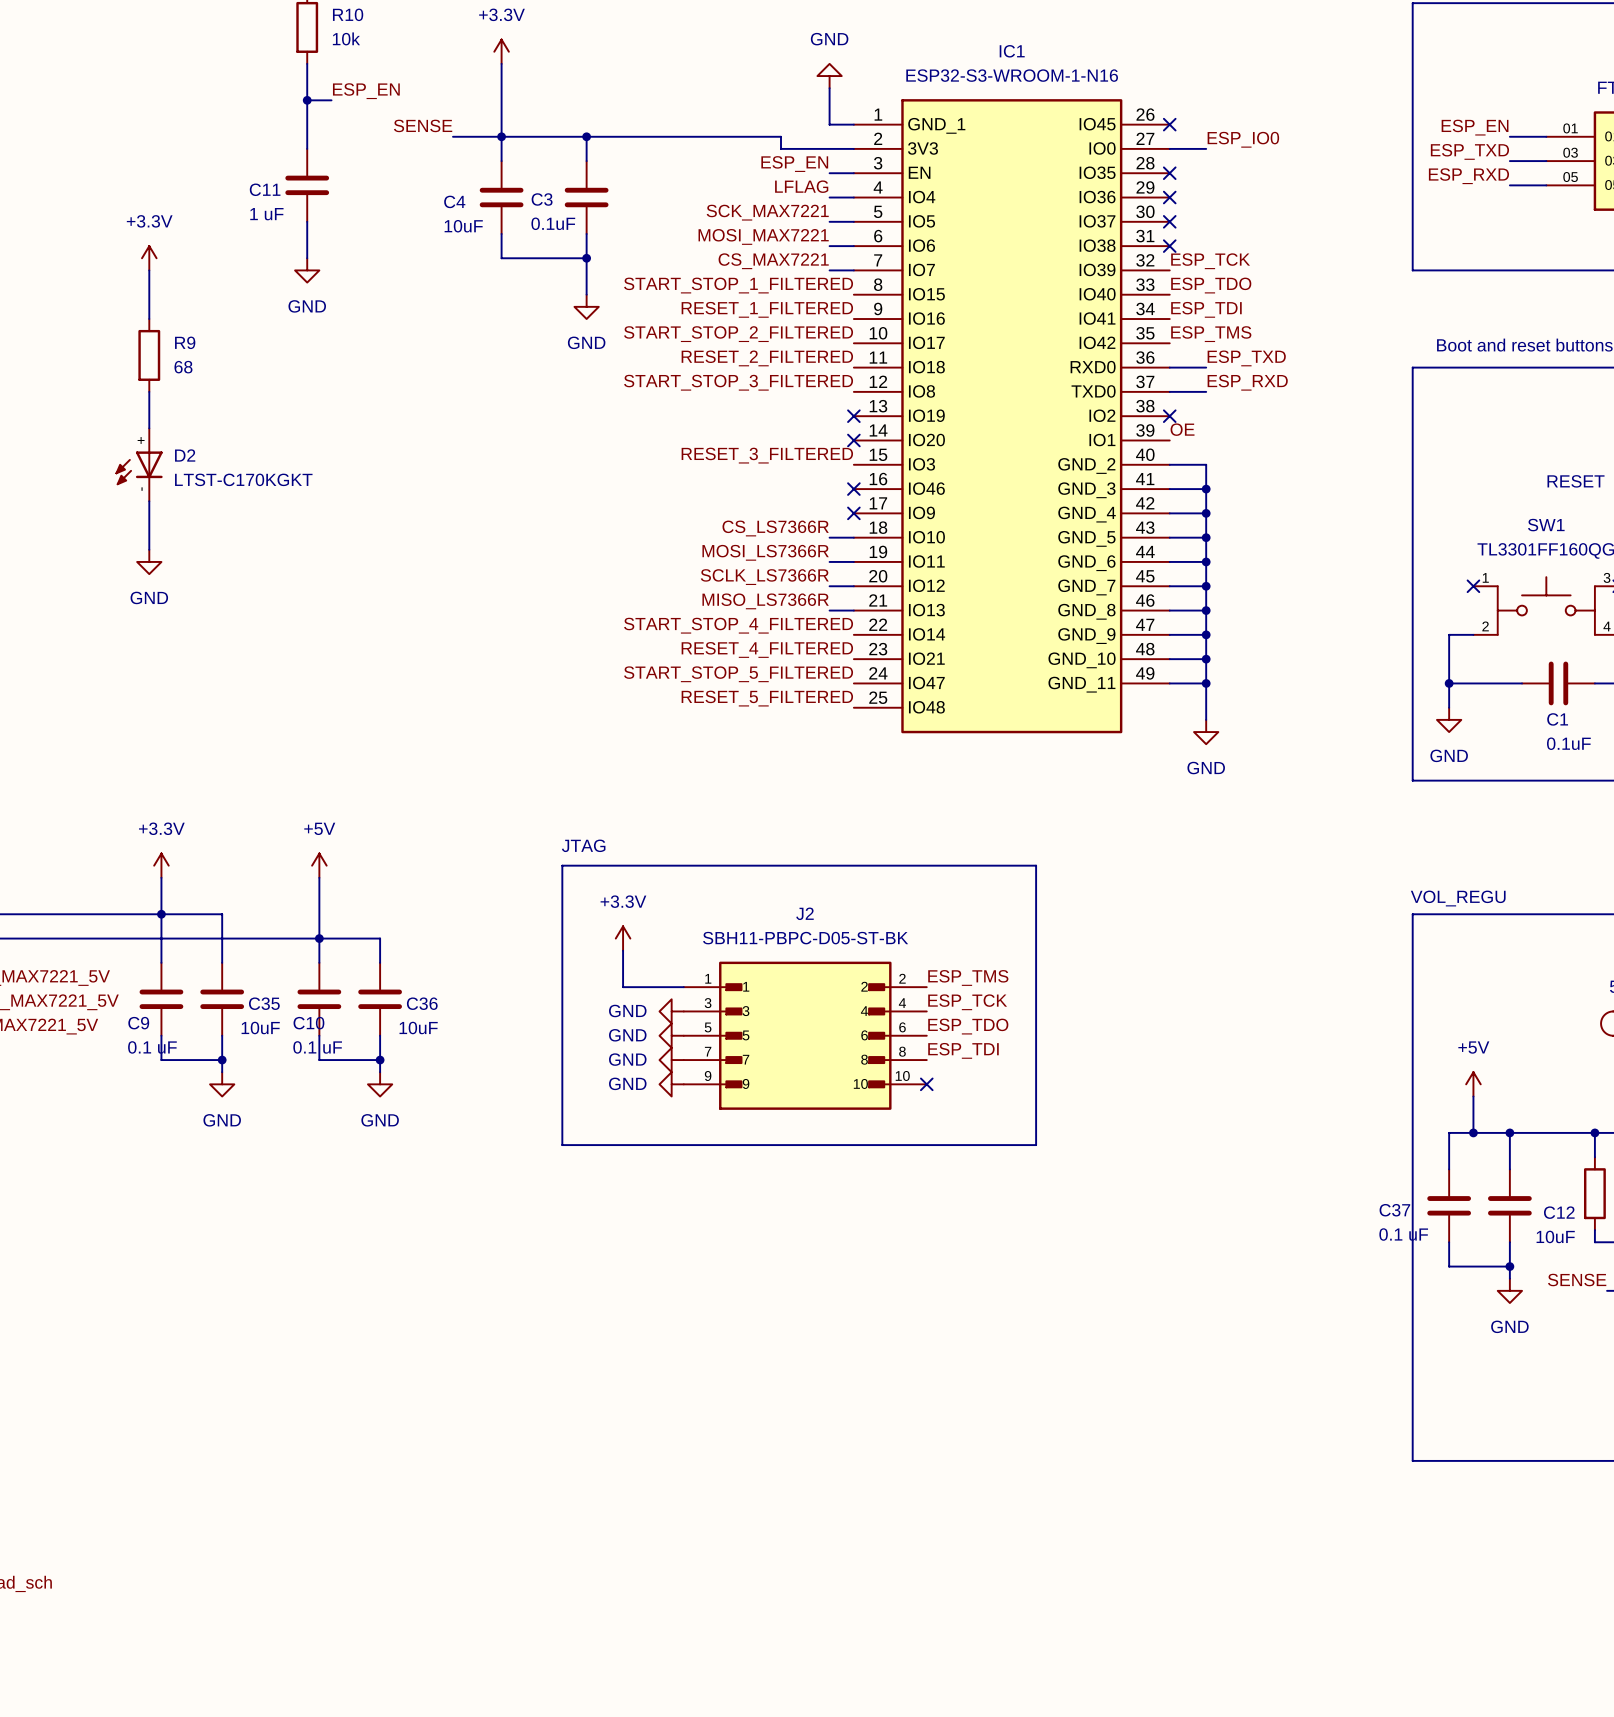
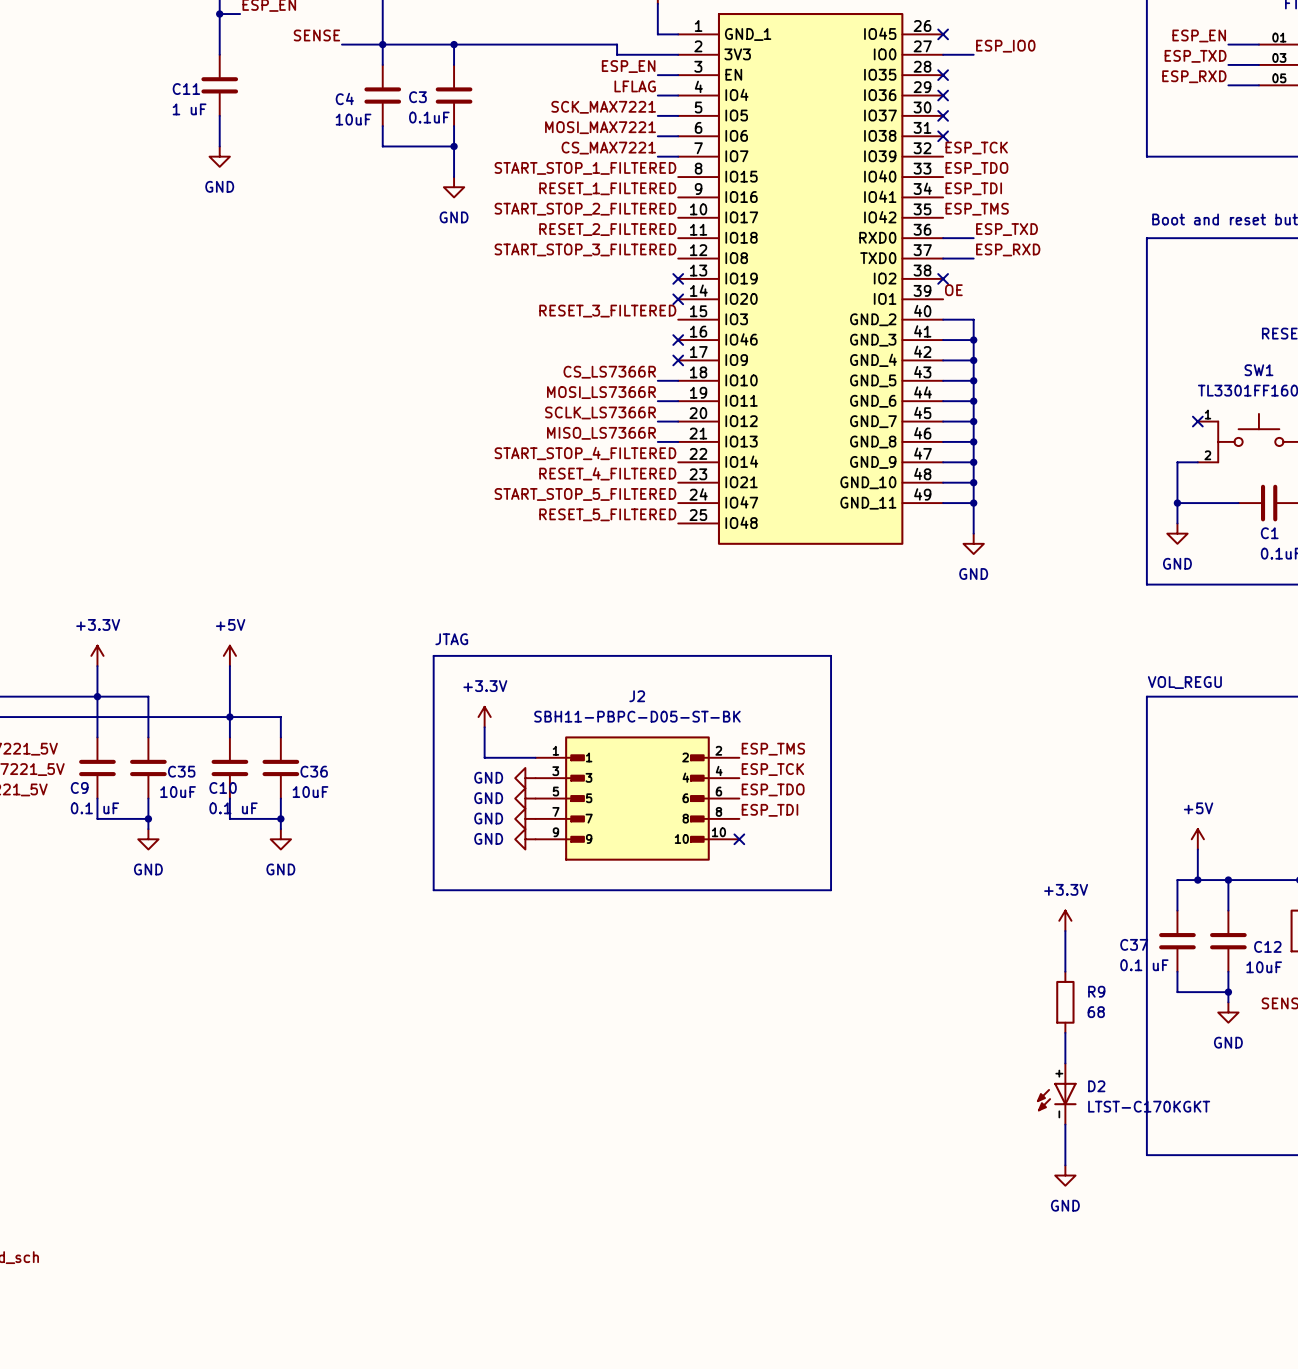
power symbol: +3.3V (149, 258) -> none
wire: (149, 270) (149, 319) -> none
R9 position: (149, 355) -> (1065, 1002)
wire: (149, 391) (149, 428) -> none
D2 position: (139, 464) -> (1056, 1094)
wire: (149, 501) (149, 549) -> none
power symbol: GND (149, 561) -> none
power symbol: none -> +3.3V (1065, 920)
wire: none -> (1065, 930) (1065, 971)
wire: none -> (1065, 1032) (1065, 1063)
wire: none -> (1065, 1124) (1065, 1165)
power symbol: none -> GND (1065, 1175)

